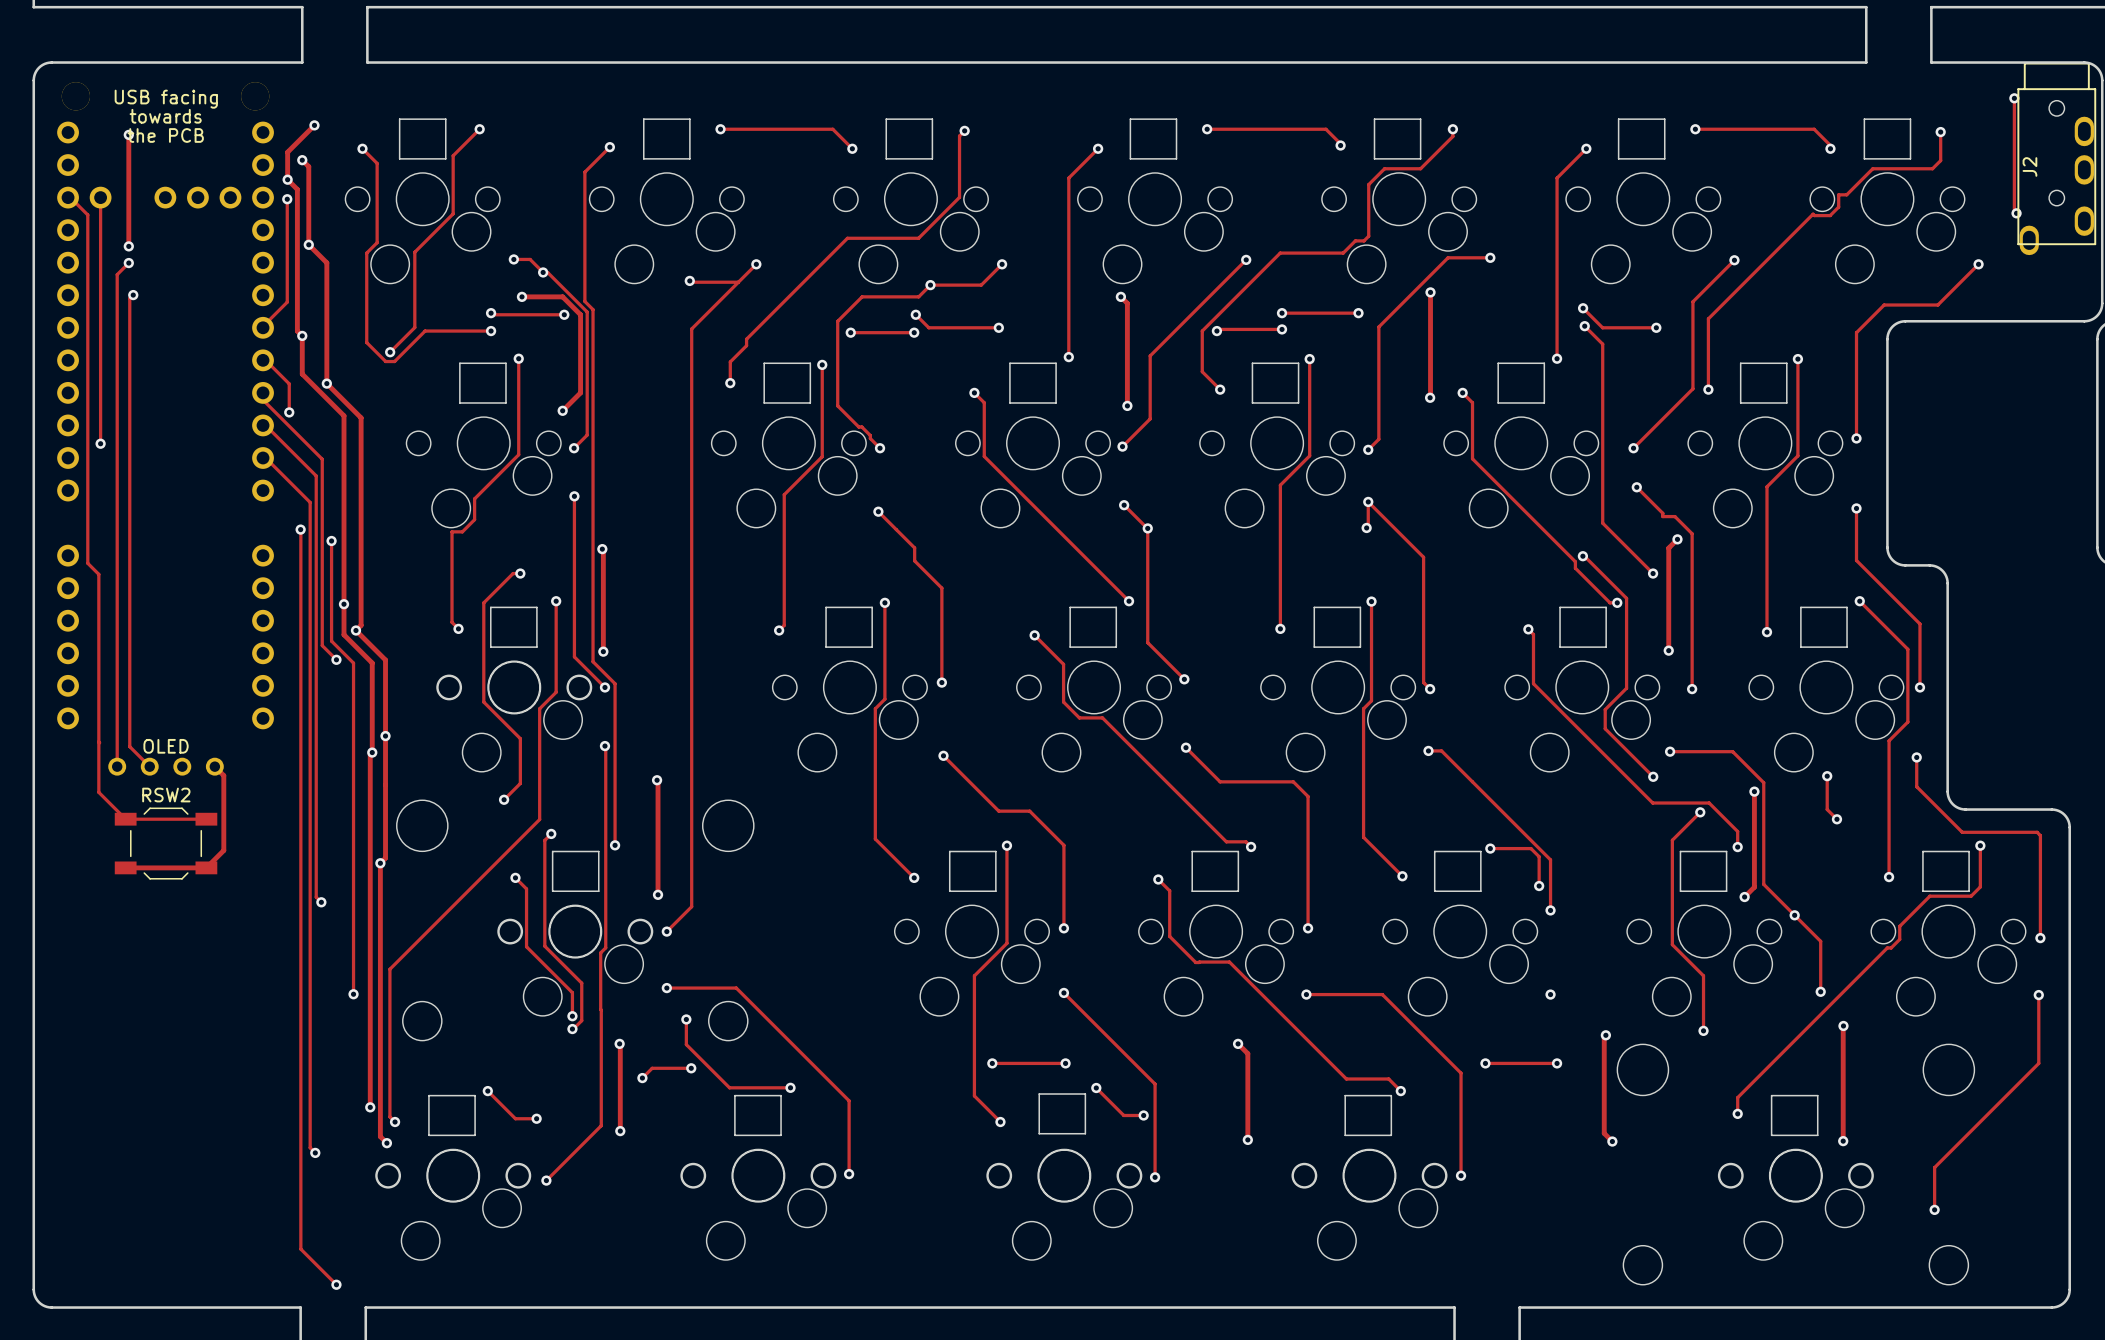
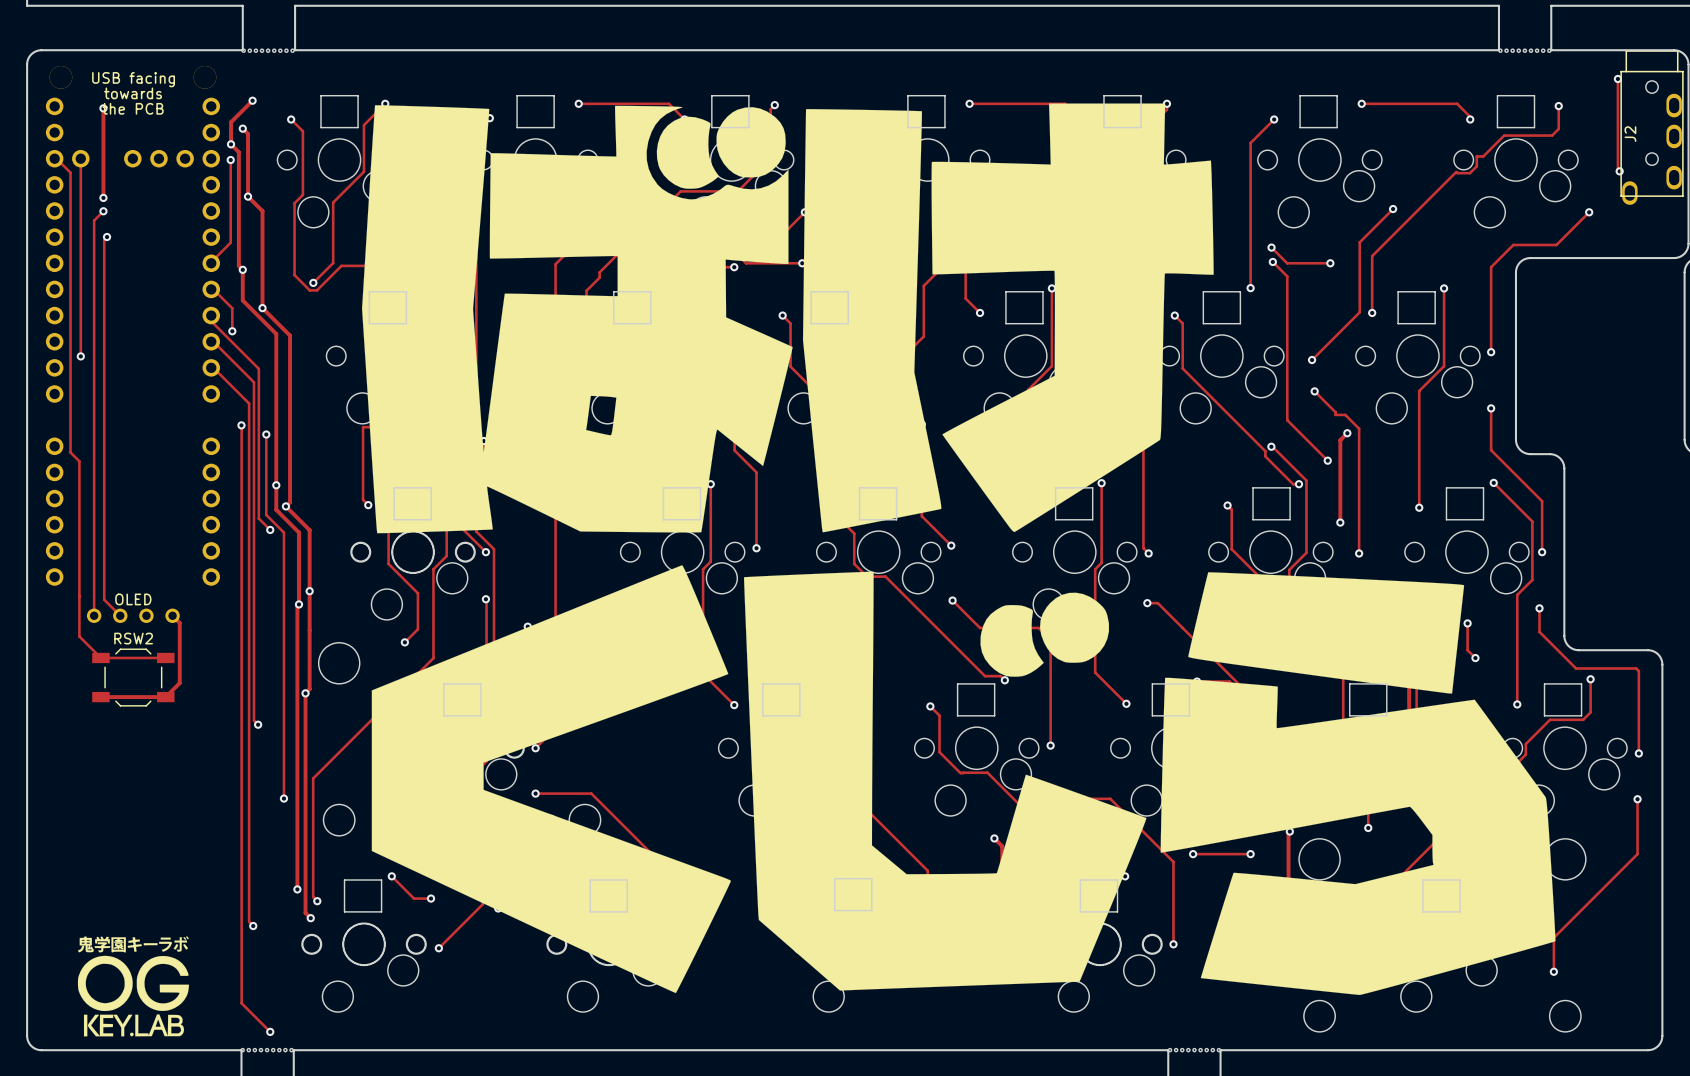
part: none -> (268, 50)
part: none -> (1524, 50)
drawing: none -> [362, 103, 1556, 995]
drawing: none -> [77, 936, 190, 1037]
part: none -> (267, 1050)
part: none -> (1194, 1050)

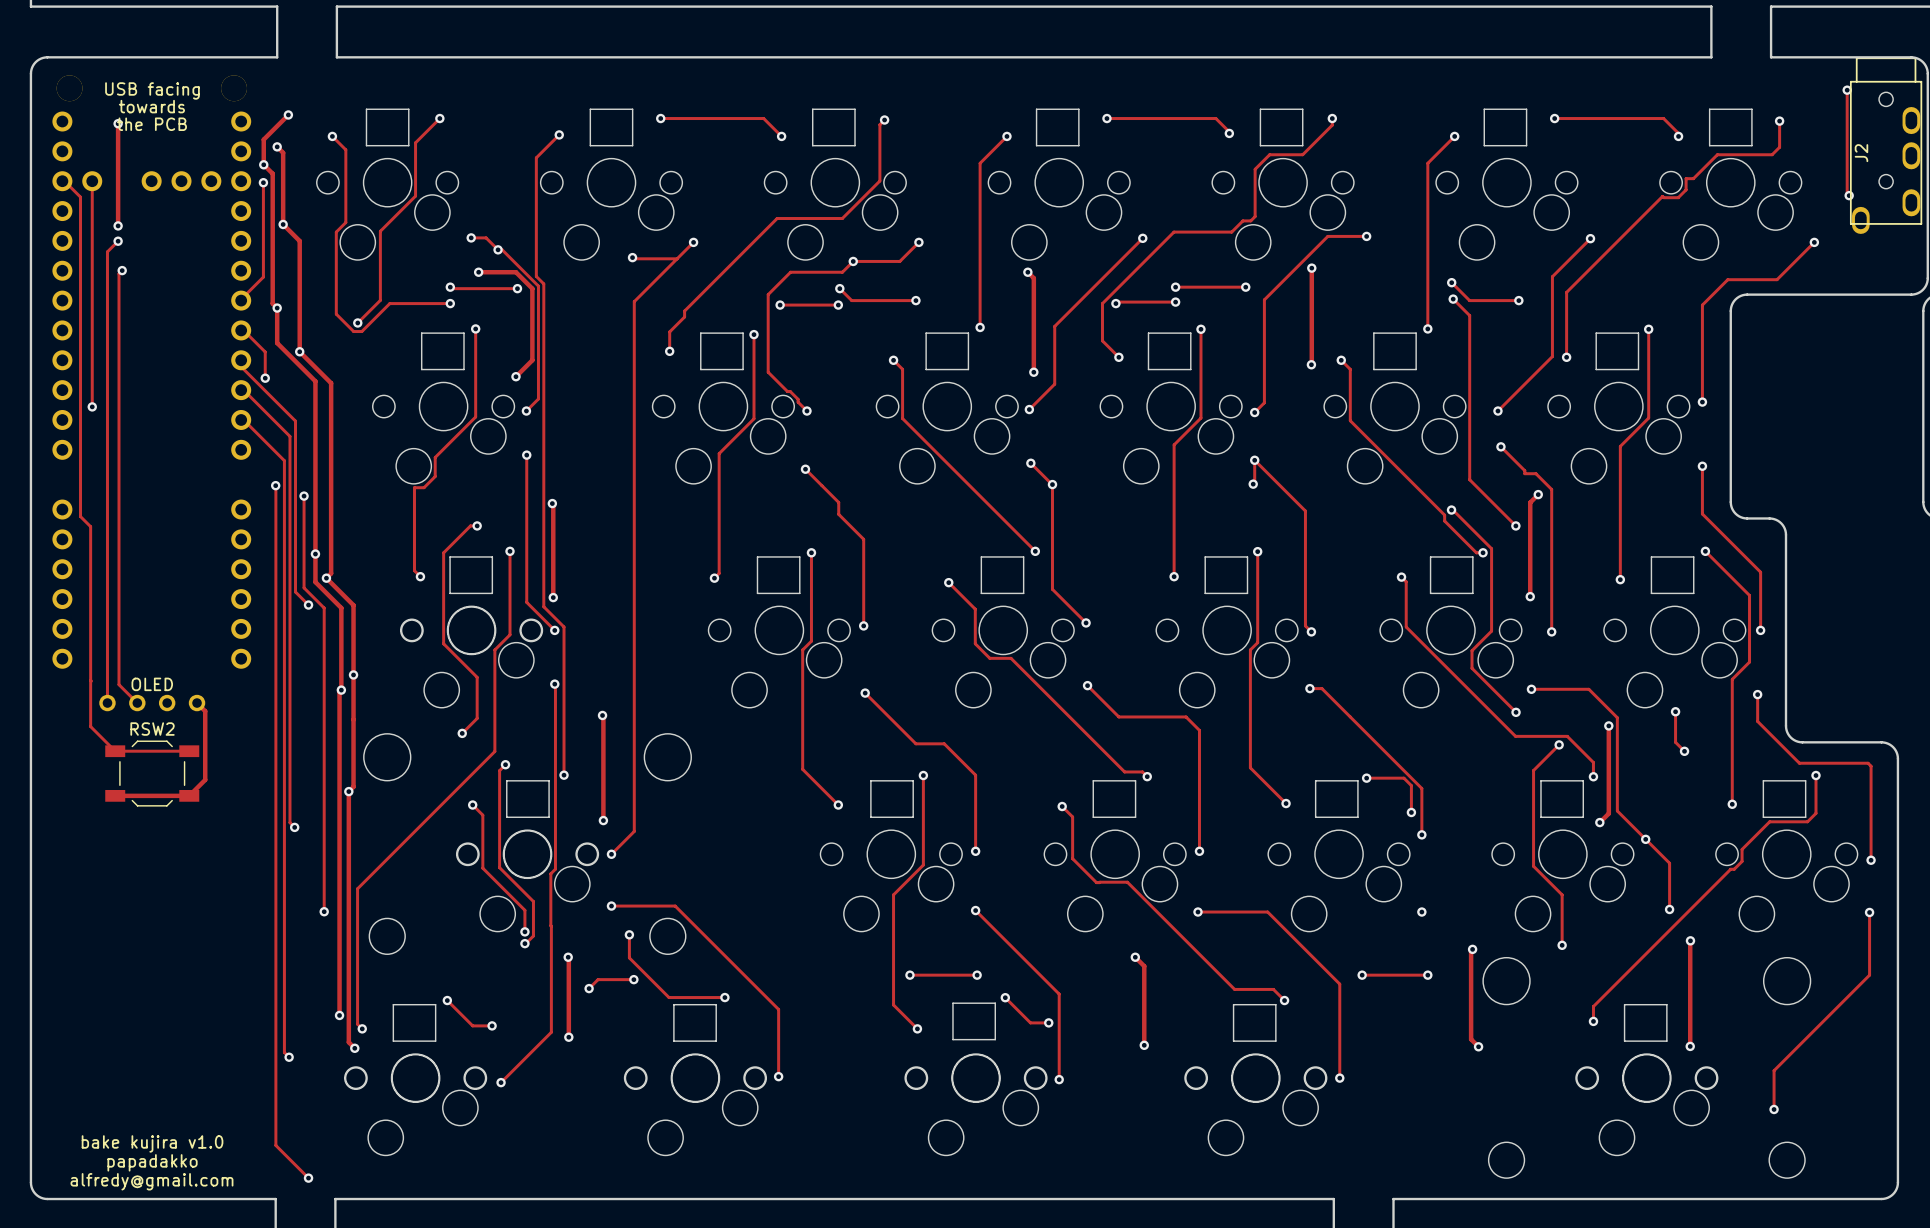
part: (268, 50) -> none
part: (1524, 50) -> none
drawing: [362, 103, 1556, 995] -> none
drawing: [77, 936, 190, 1037] -> none
text: none -> bake kujira v1.0 (152, 1143)
text: none -> papadakko (152, 1162)
text: none -> alfredy@gmail.com (151, 1181)
part: (267, 1050) -> none
part: (1194, 1050) -> none

